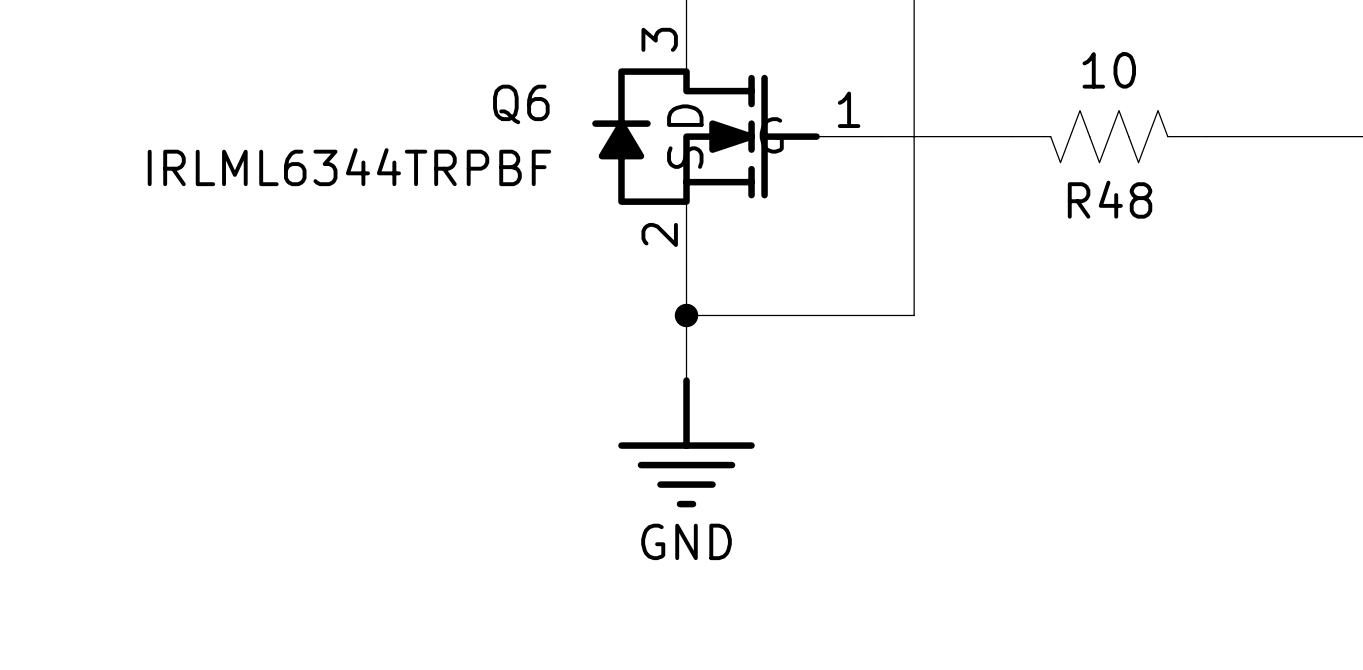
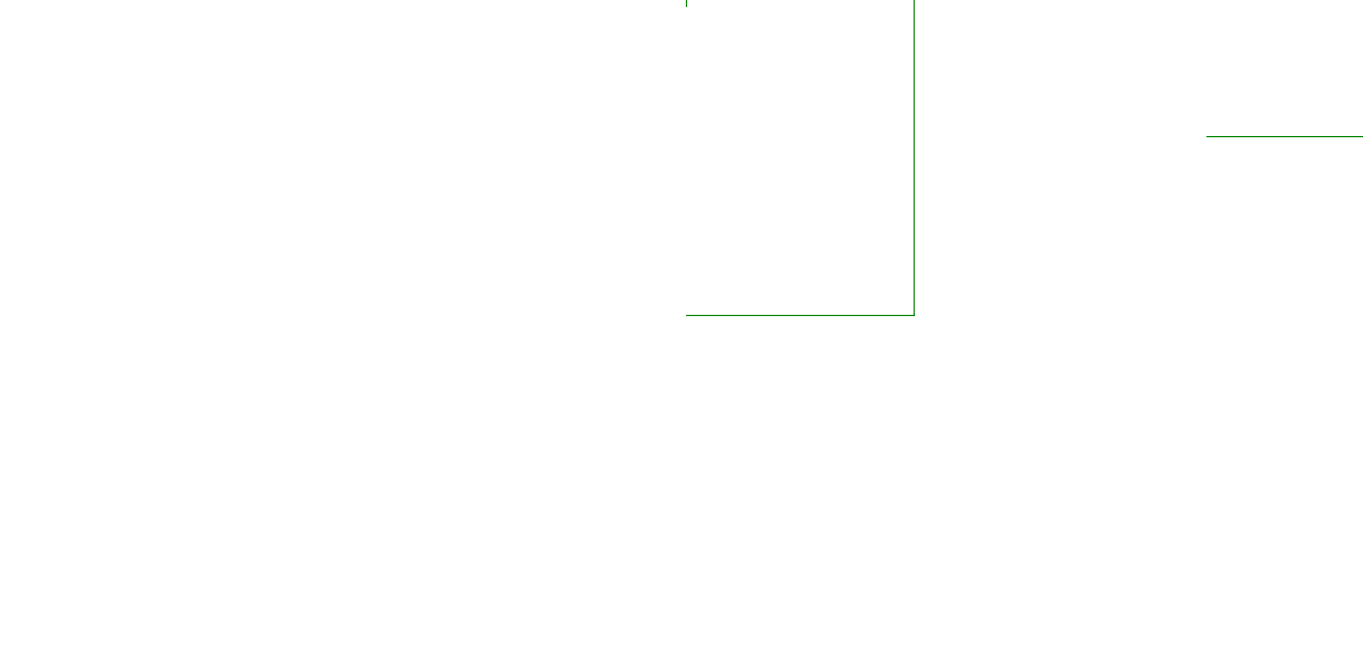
Q6: IRLML6344TRPBF (736, 136) -> none
wire: (881, 136) (1011, 136) -> none
R48: 10 (1109, 136) -> none
wire: (686, 266) (686, 380) -> none
junction: (686, 315) -> none
power symbol: GND (686, 442) -> none

